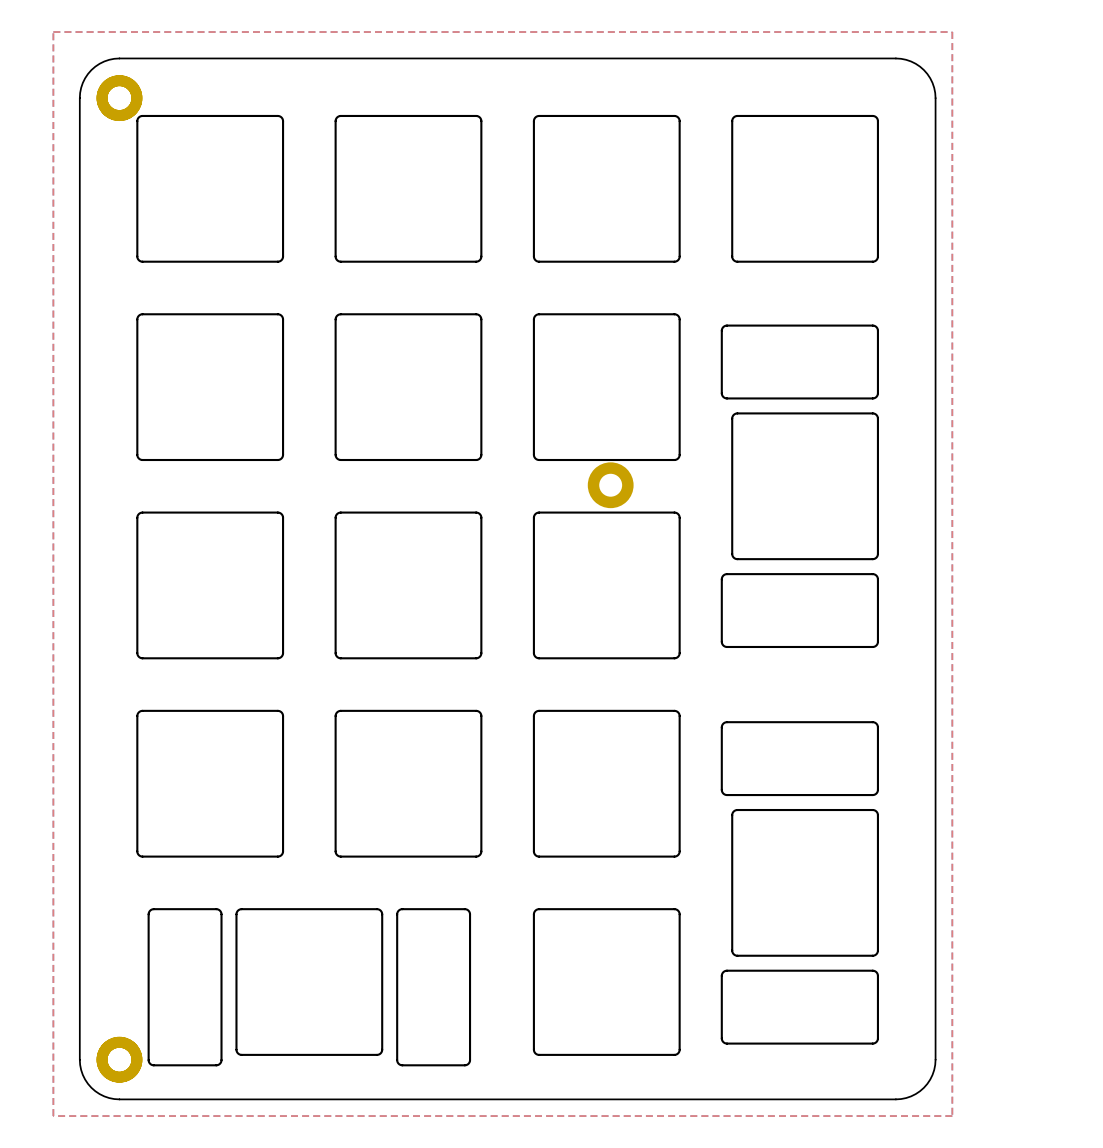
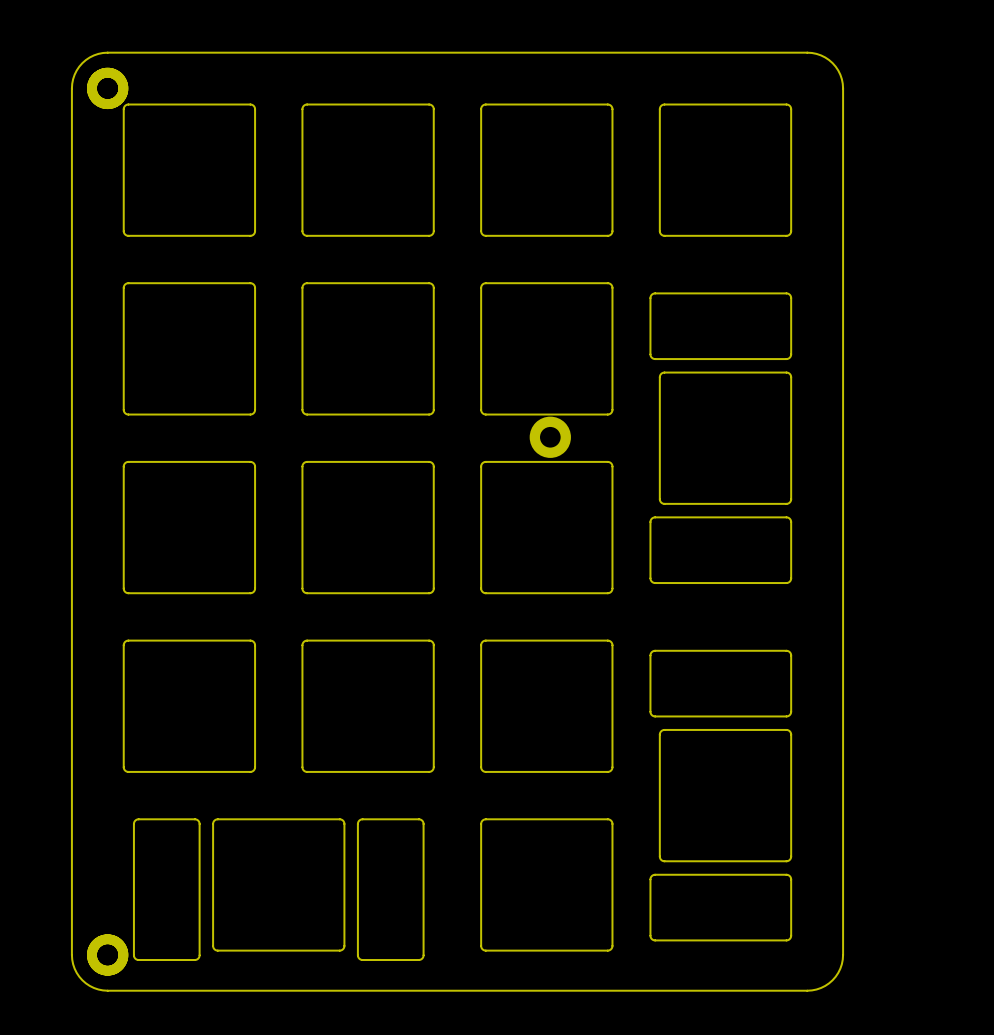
top zone outline: (53, 32) (53, 1116) (952, 1116) (952, 32) (53, 32) -> none

